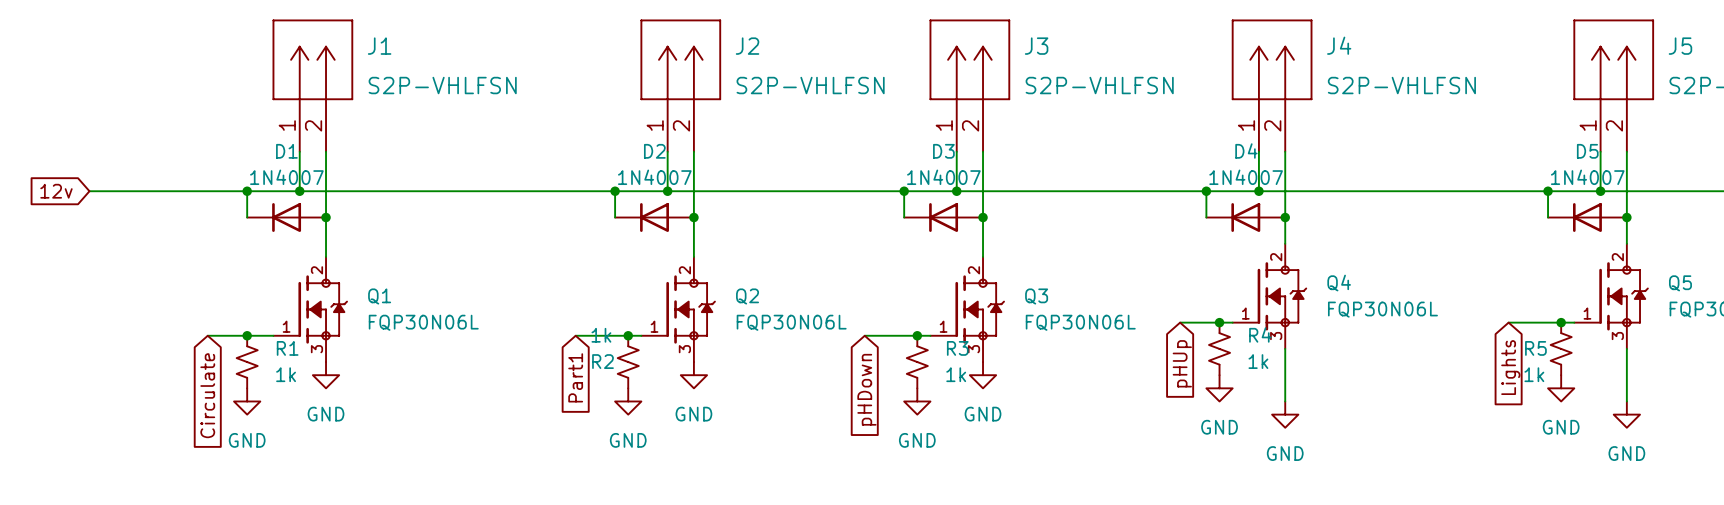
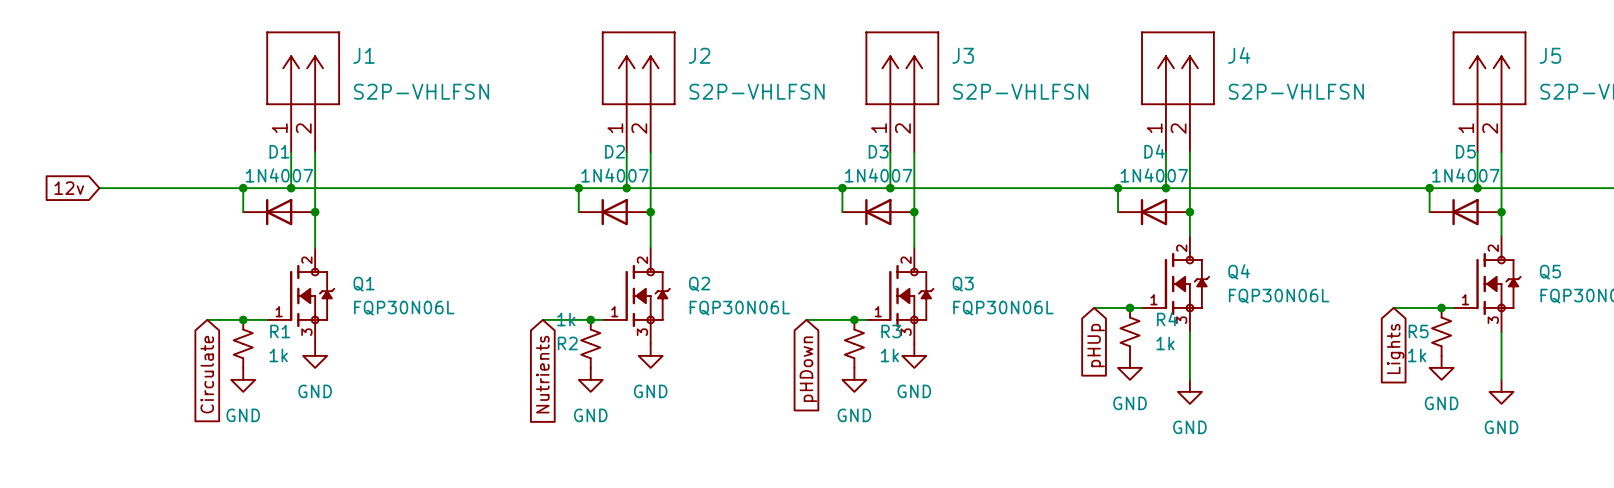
global label: Part1 (575, 377) -> Nutrients (542, 374)

